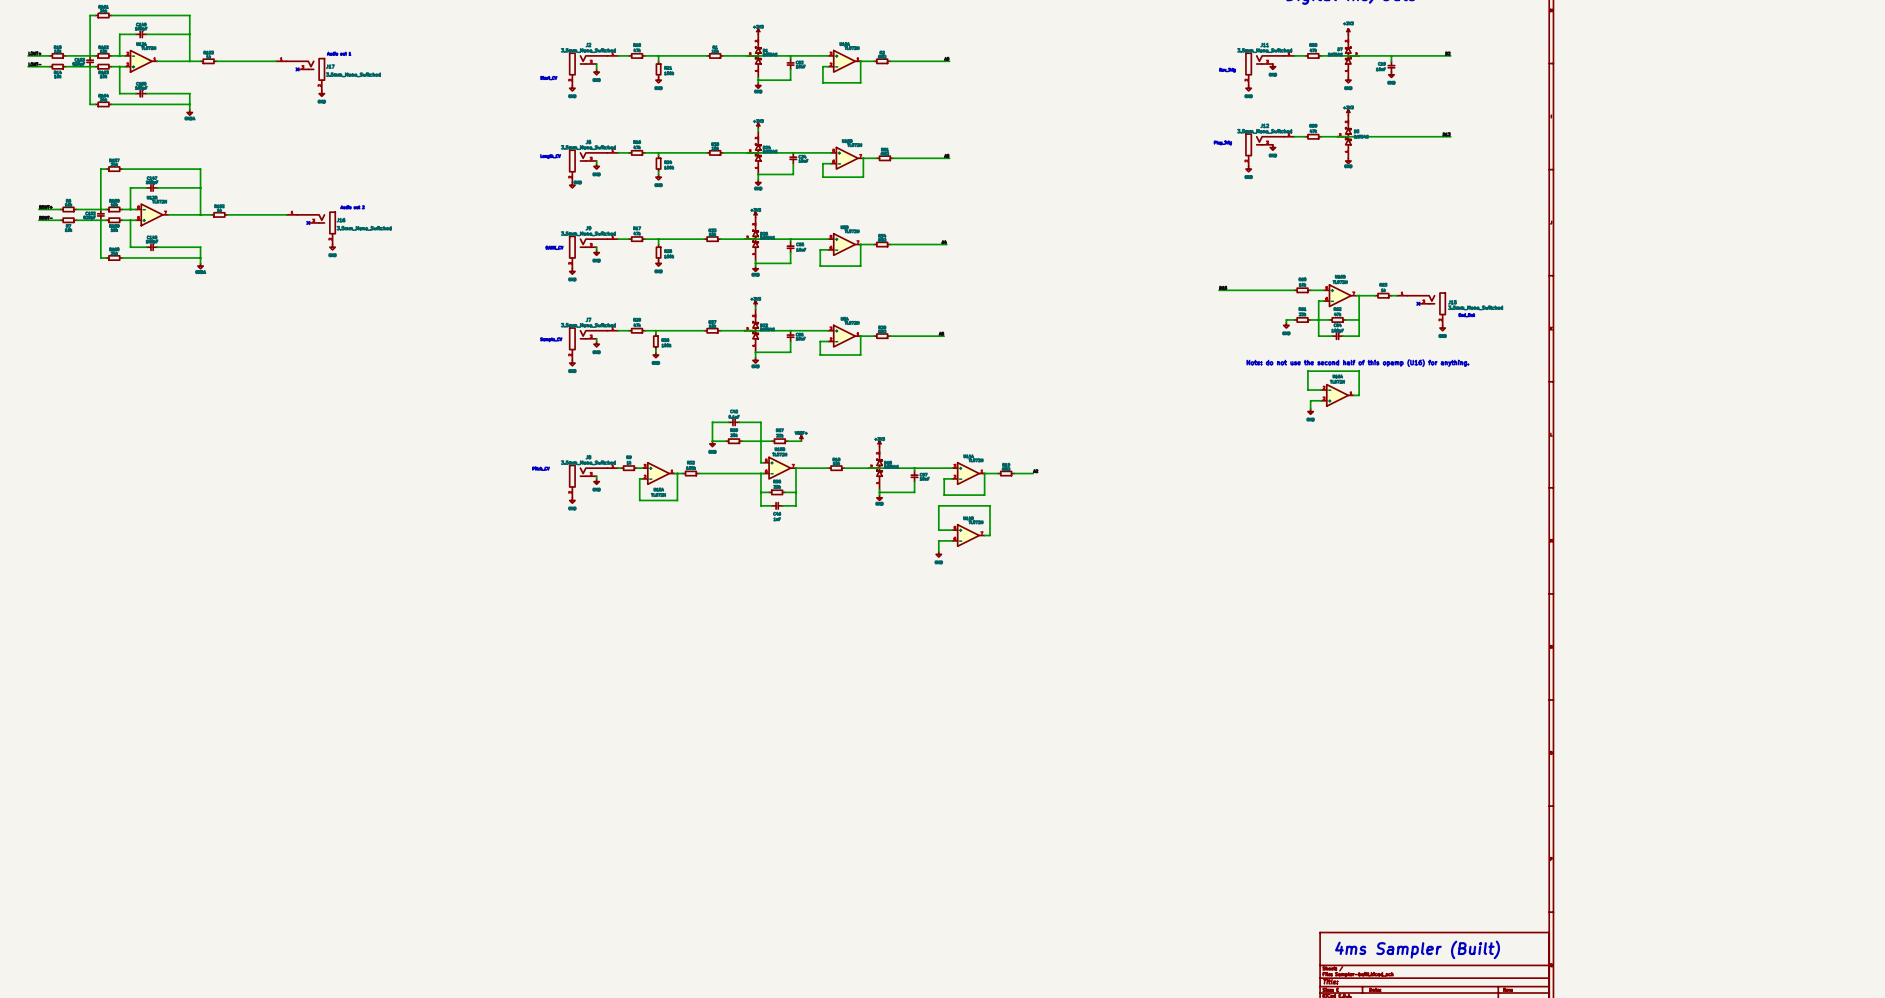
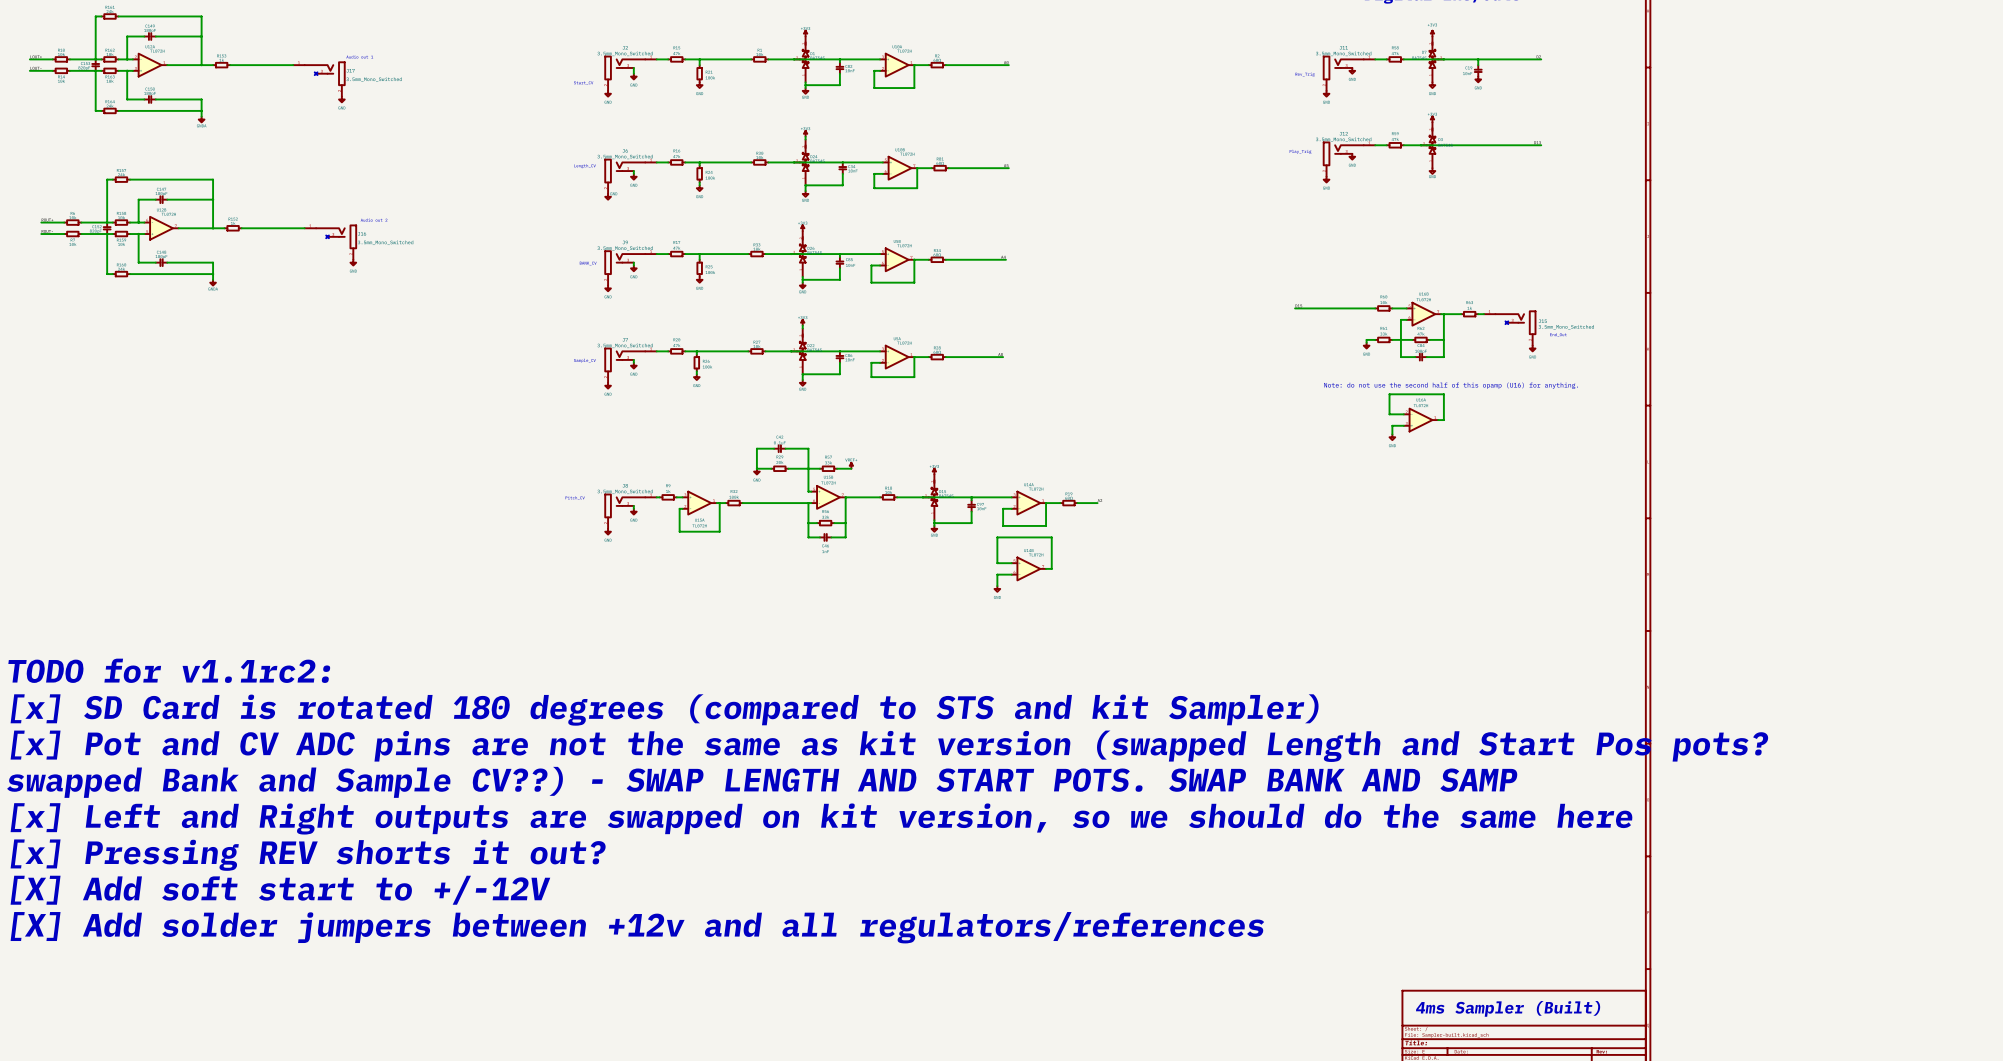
text: none -> TODO for v1.1rc2: (169, 670)
text: none -> [x] SD Card is rotated 180 degrees (compared to STS and kit Sampler) (664, 709)
text: none -> [x] Pot and CV ADC pins are not the same as kit version (swapped Length and Start Pos pots? (889, 746)
text: none -> swapped Bank and Sample CV??) - SWAP LENGTH AND START POTS. SWAP BANK AND SAMP (762, 782)
text: none -> [x] Left and Right outputs are swapped on kit version, so we should do the same here (821, 818)
text: none -> [x] Pressing REV shorts it out? (308, 855)
text: none -> [X] Add soft start to +/-12V (280, 890)
text: none -> [X] Add solder jumpers between +12v and all regulators/references (637, 927)

